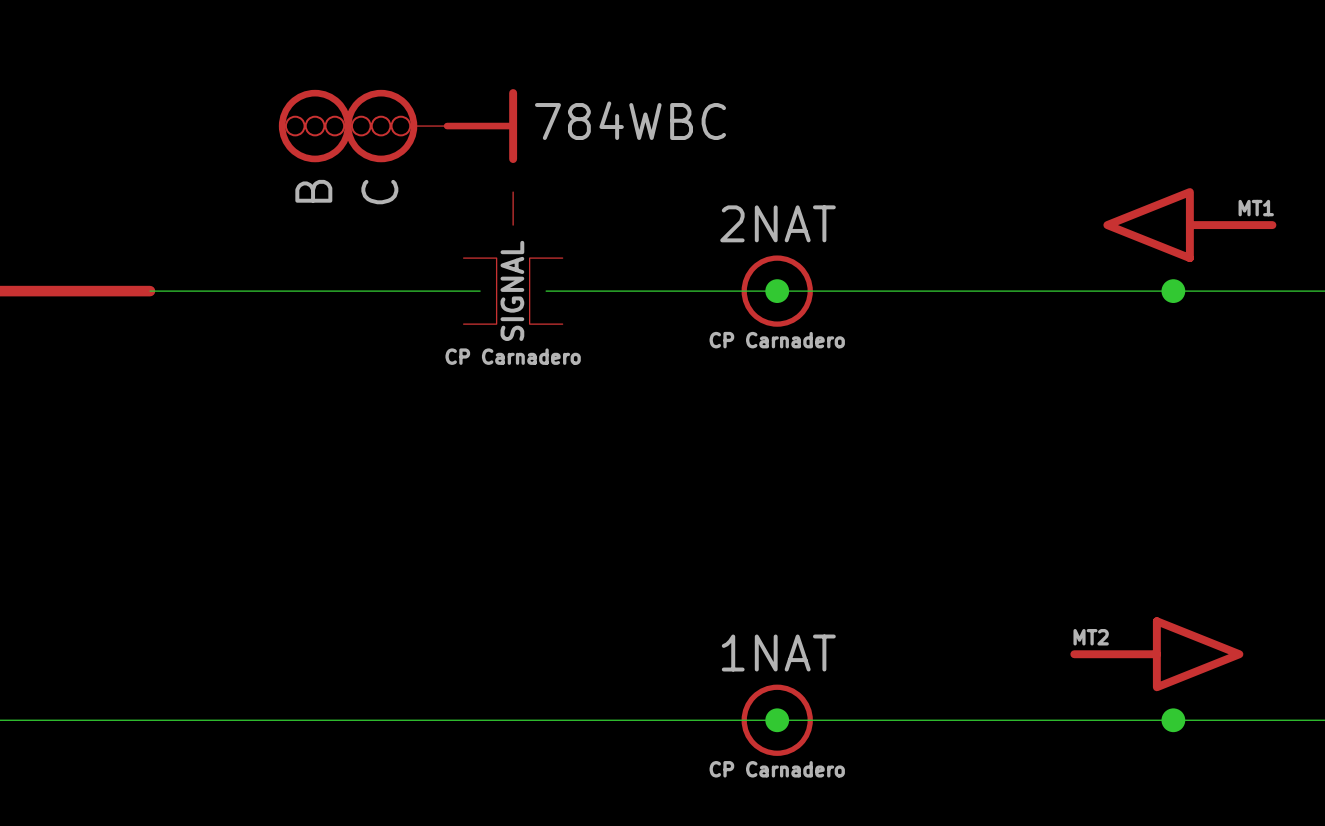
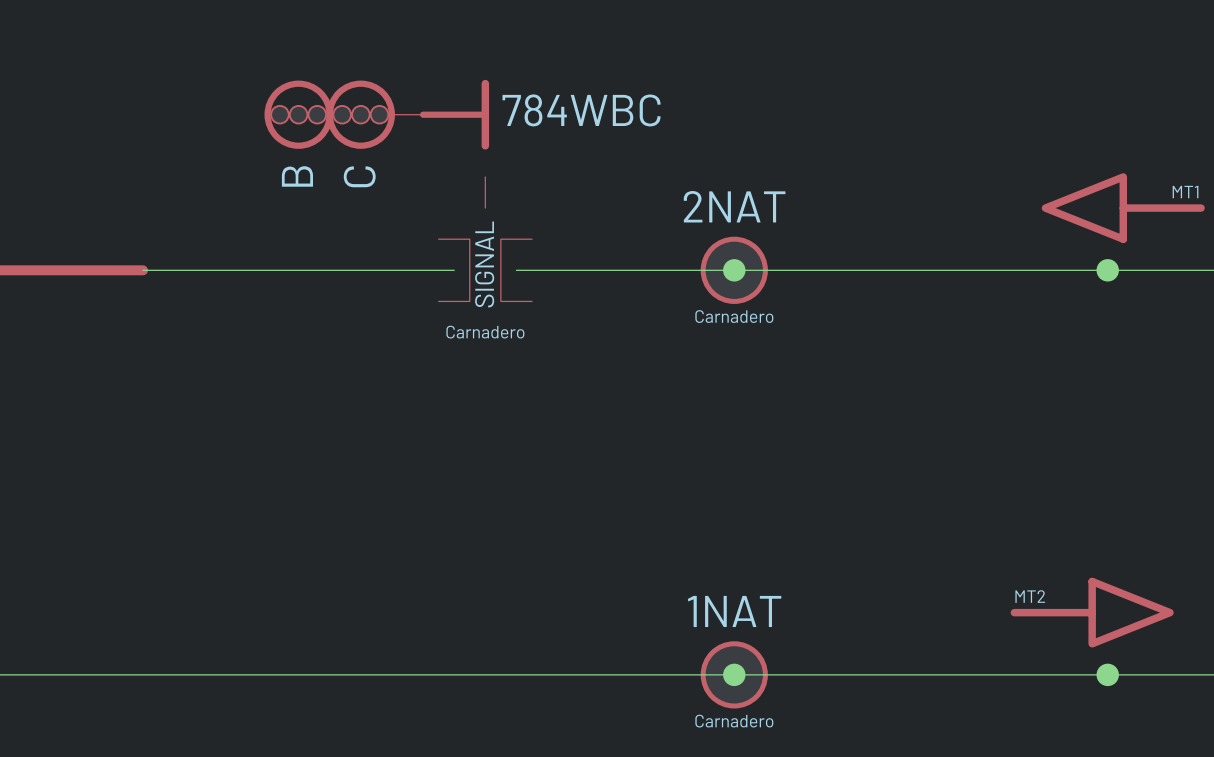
part text: CP Carnadero (777, 340) -> Carnadero (734, 316)
part text: CP Carnadero (513, 356) -> Carnadero (485, 332)
part text: CP Carnadero (777, 769) -> Carnadero (734, 721)

